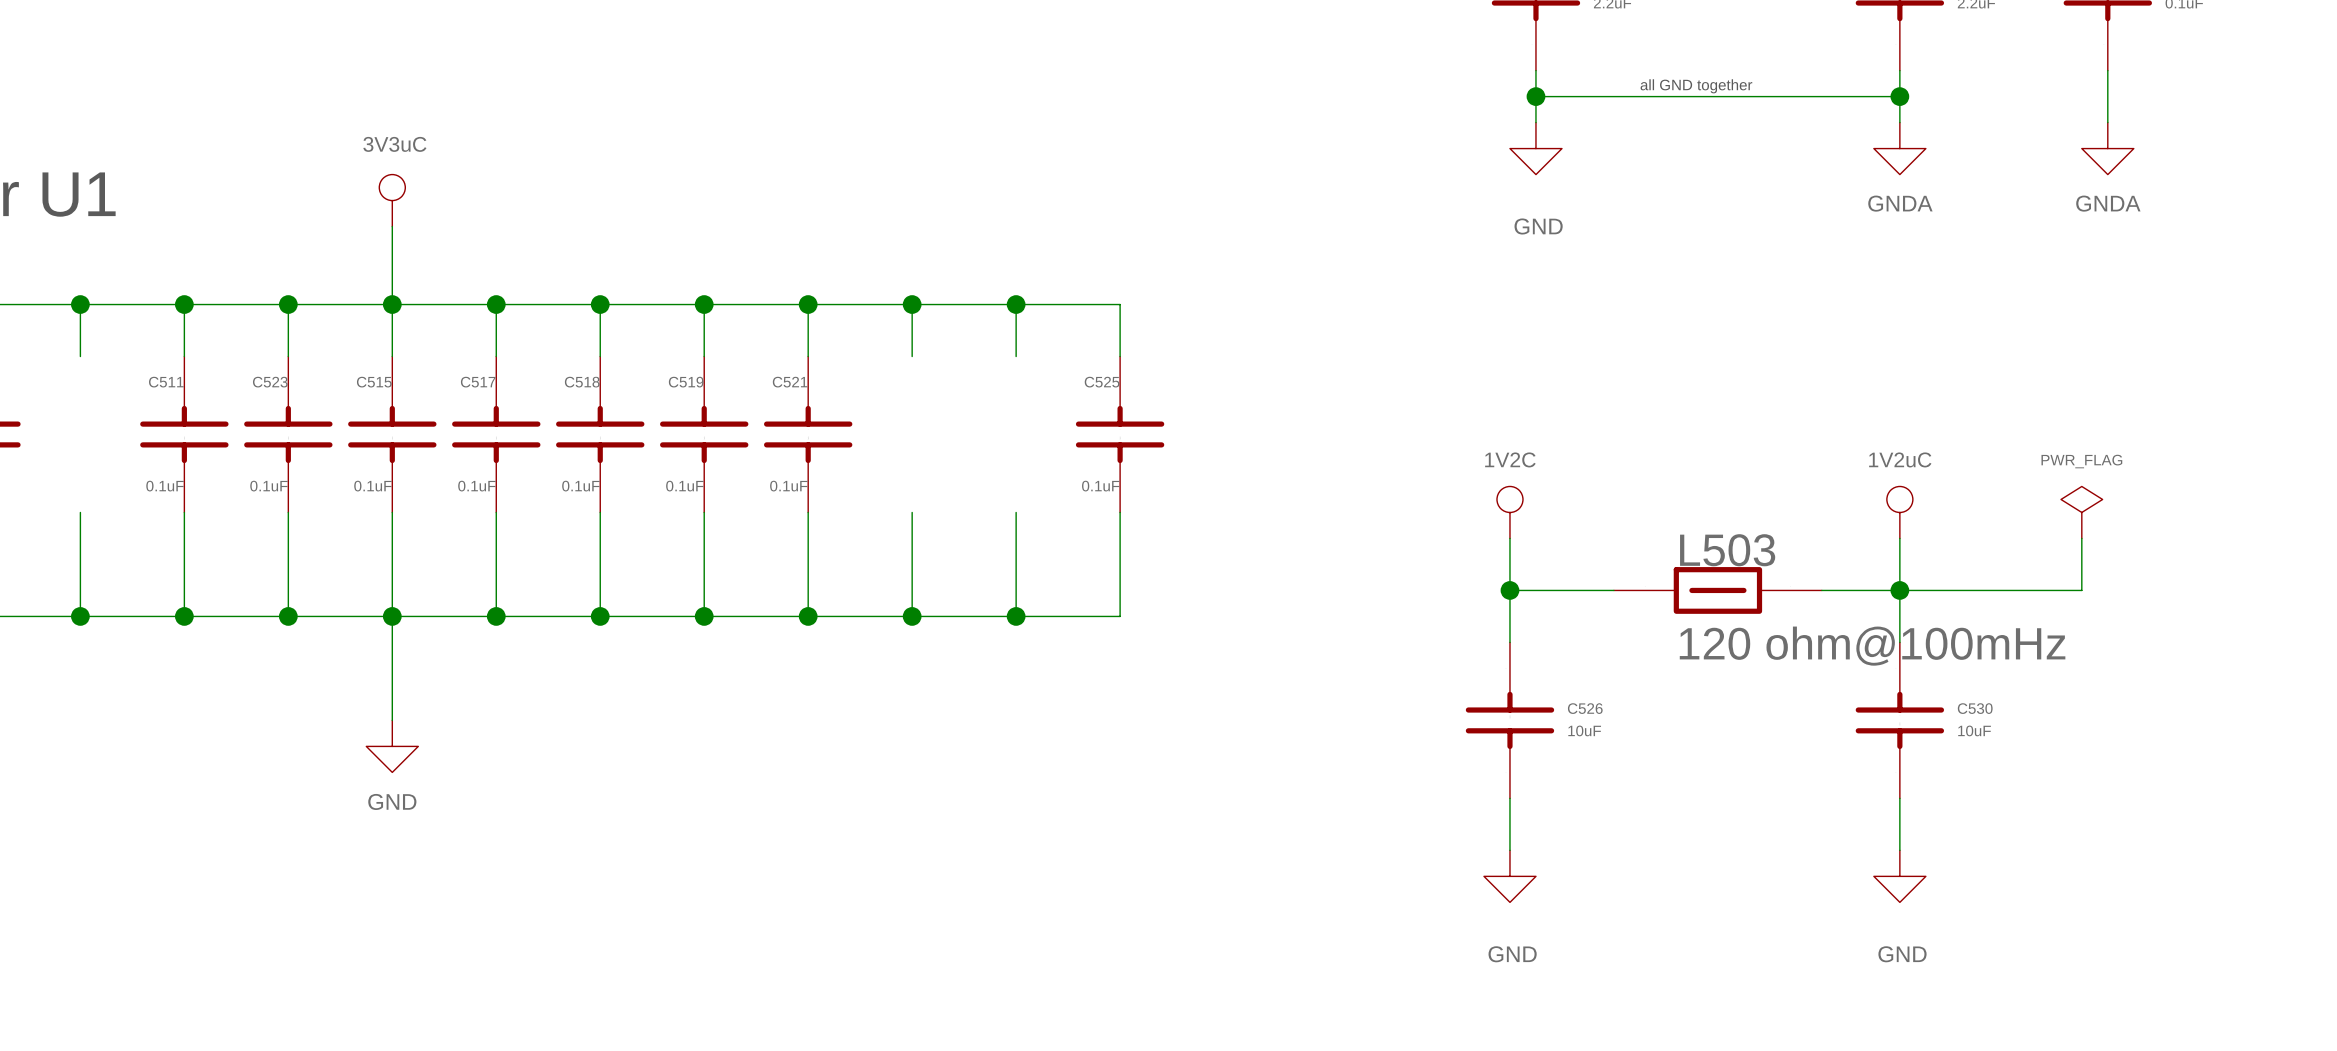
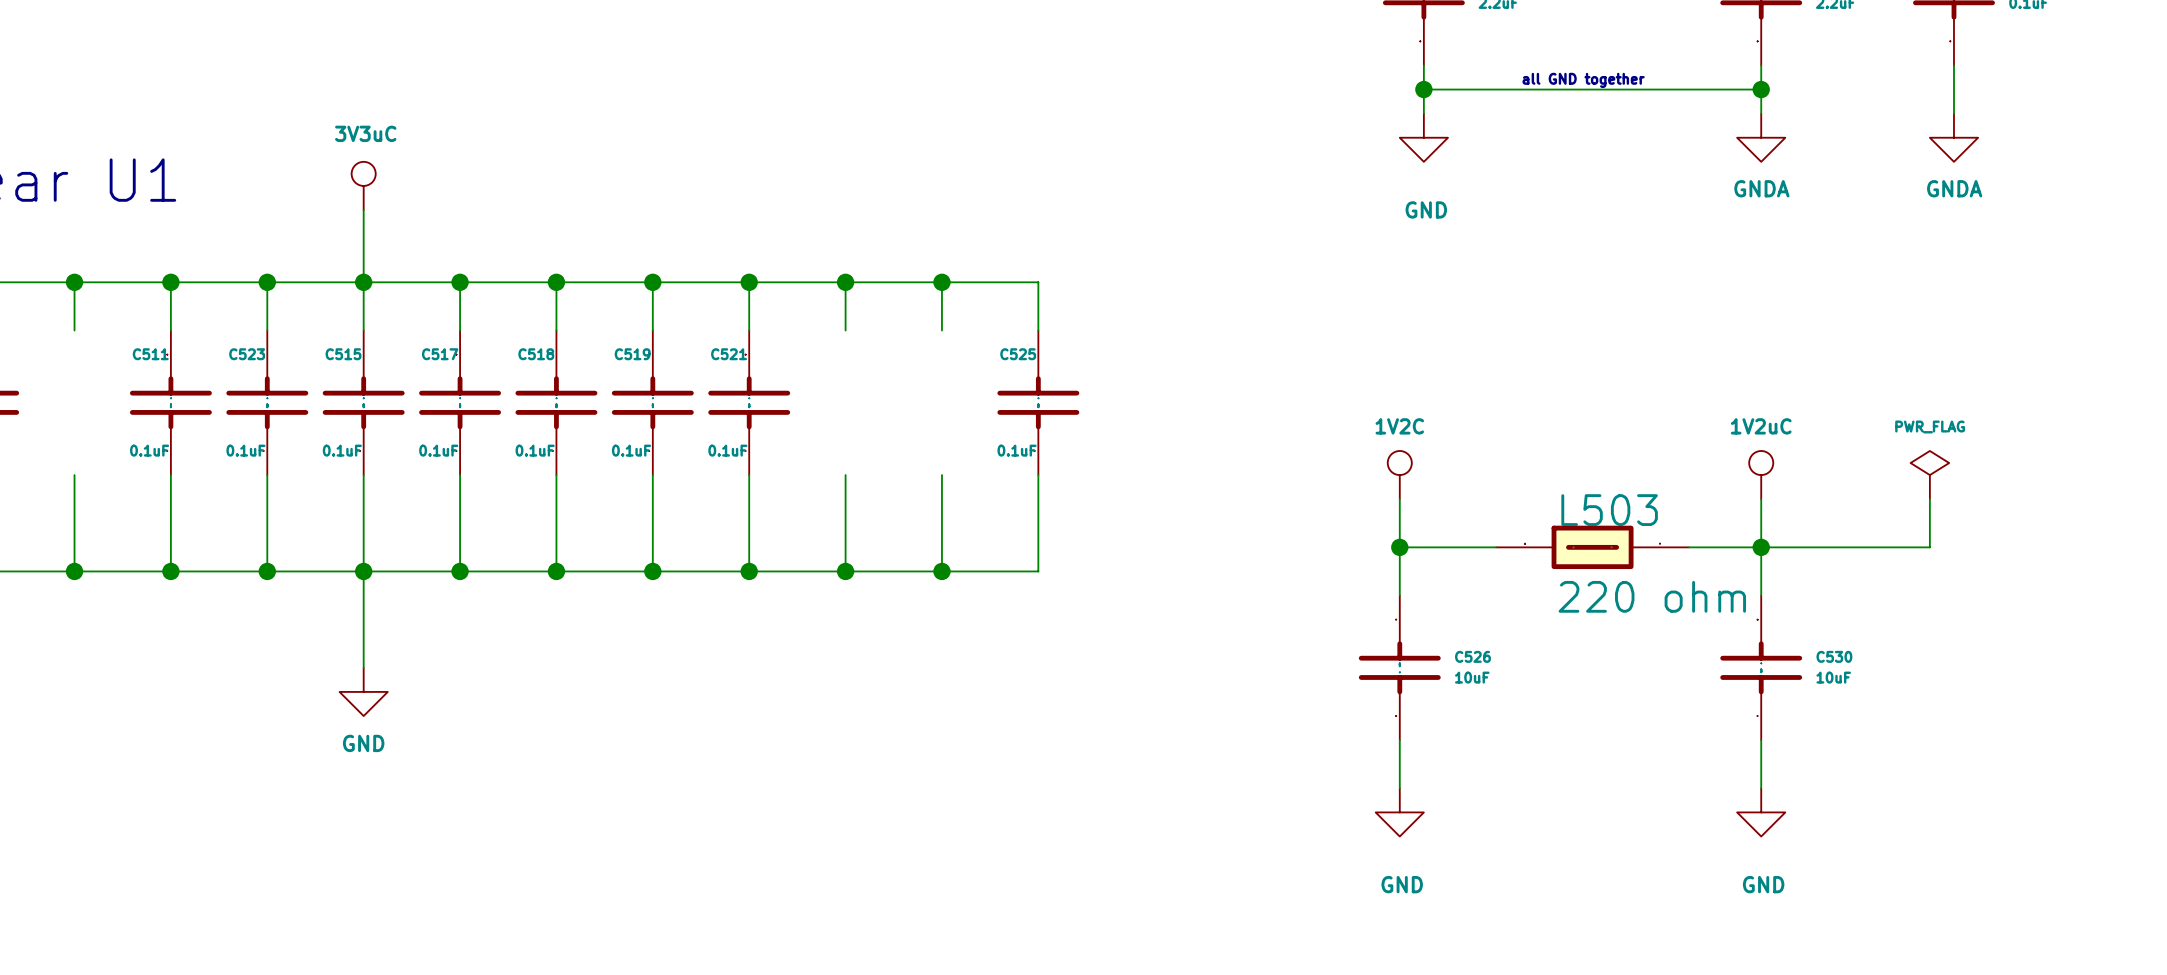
L503 value: 120 ohm@100mHz (1872, 646) -> 220 ohm (1652, 596)

